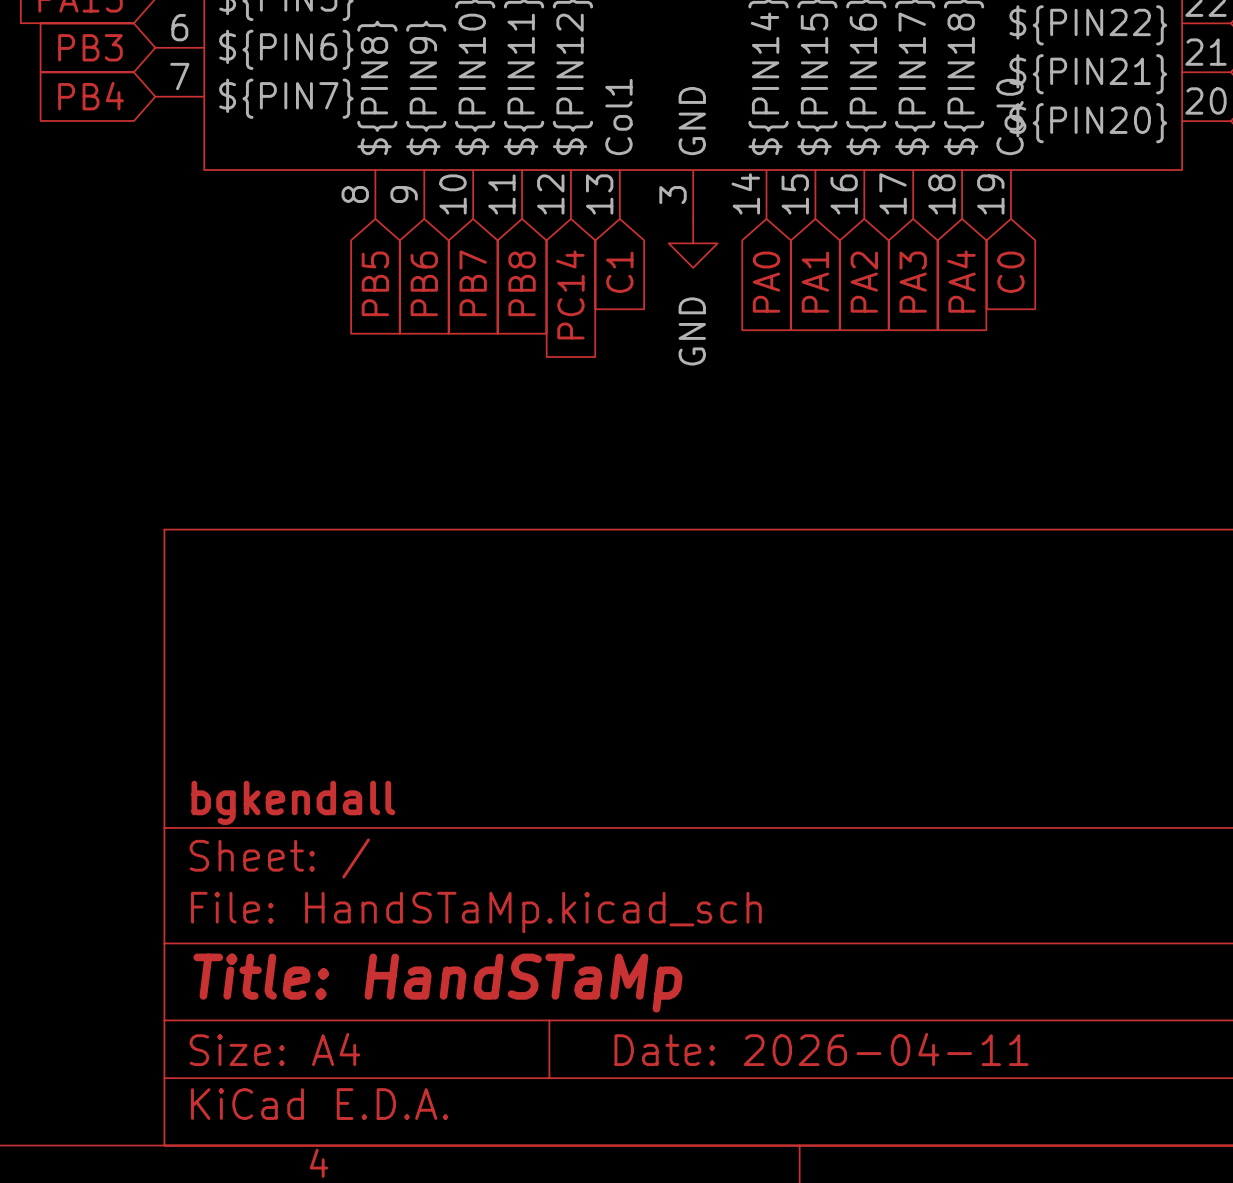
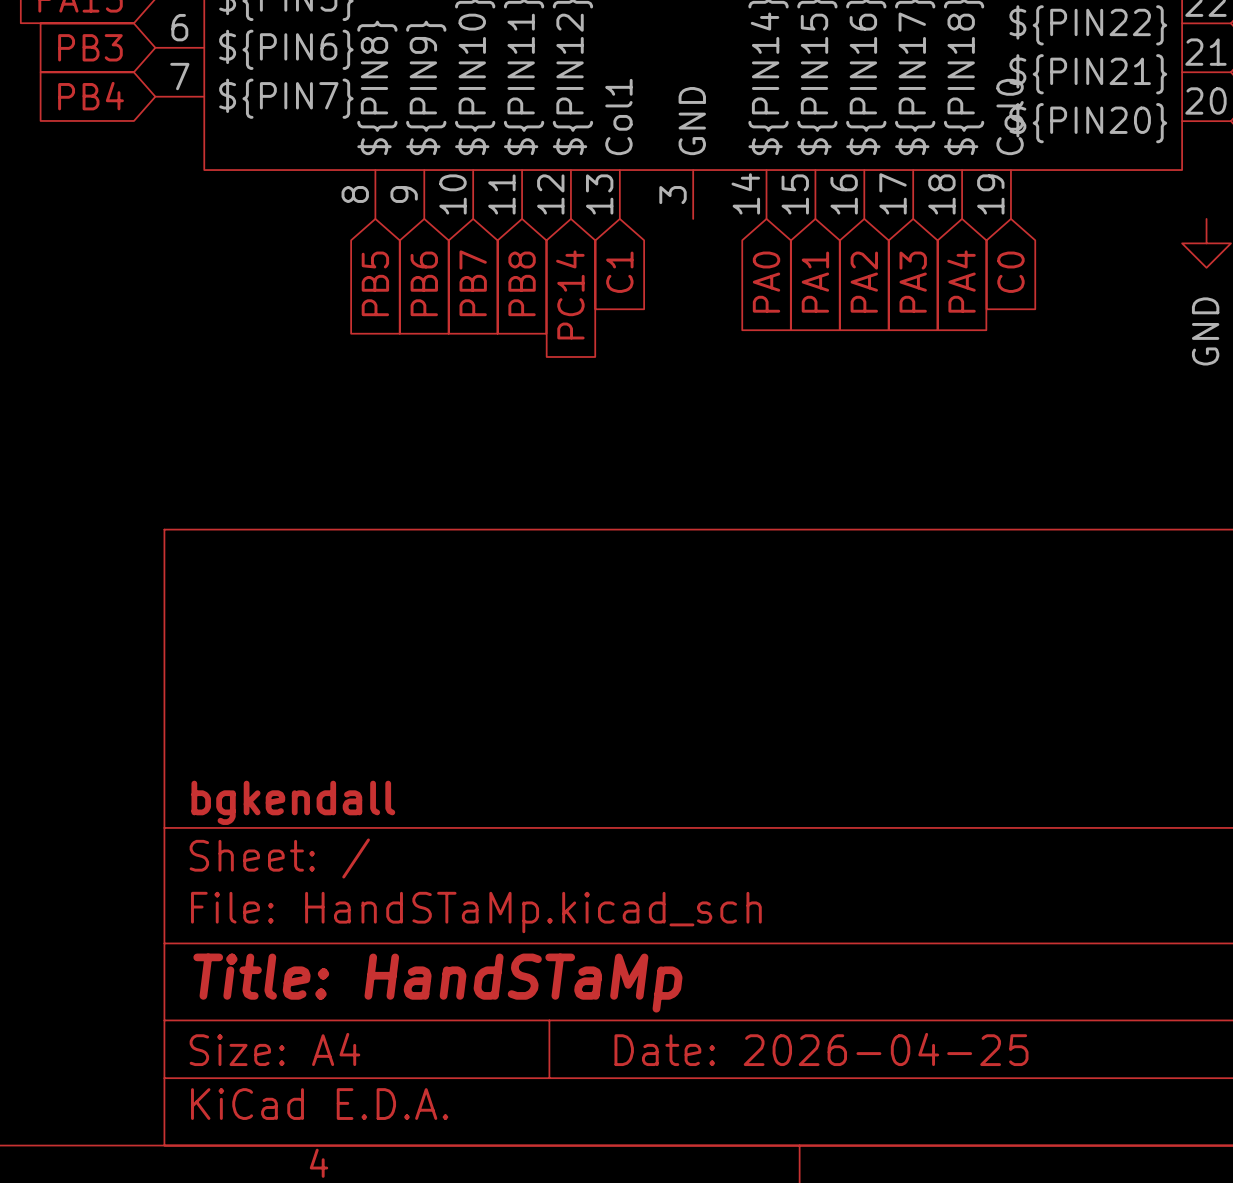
power symbol: GND (693, 243) -> none
power symbol: none -> GND (1206, 243)
title block: Date: 2026-04-11 (821, 1049) -> Date: 2026-04-25 (821, 1049)

